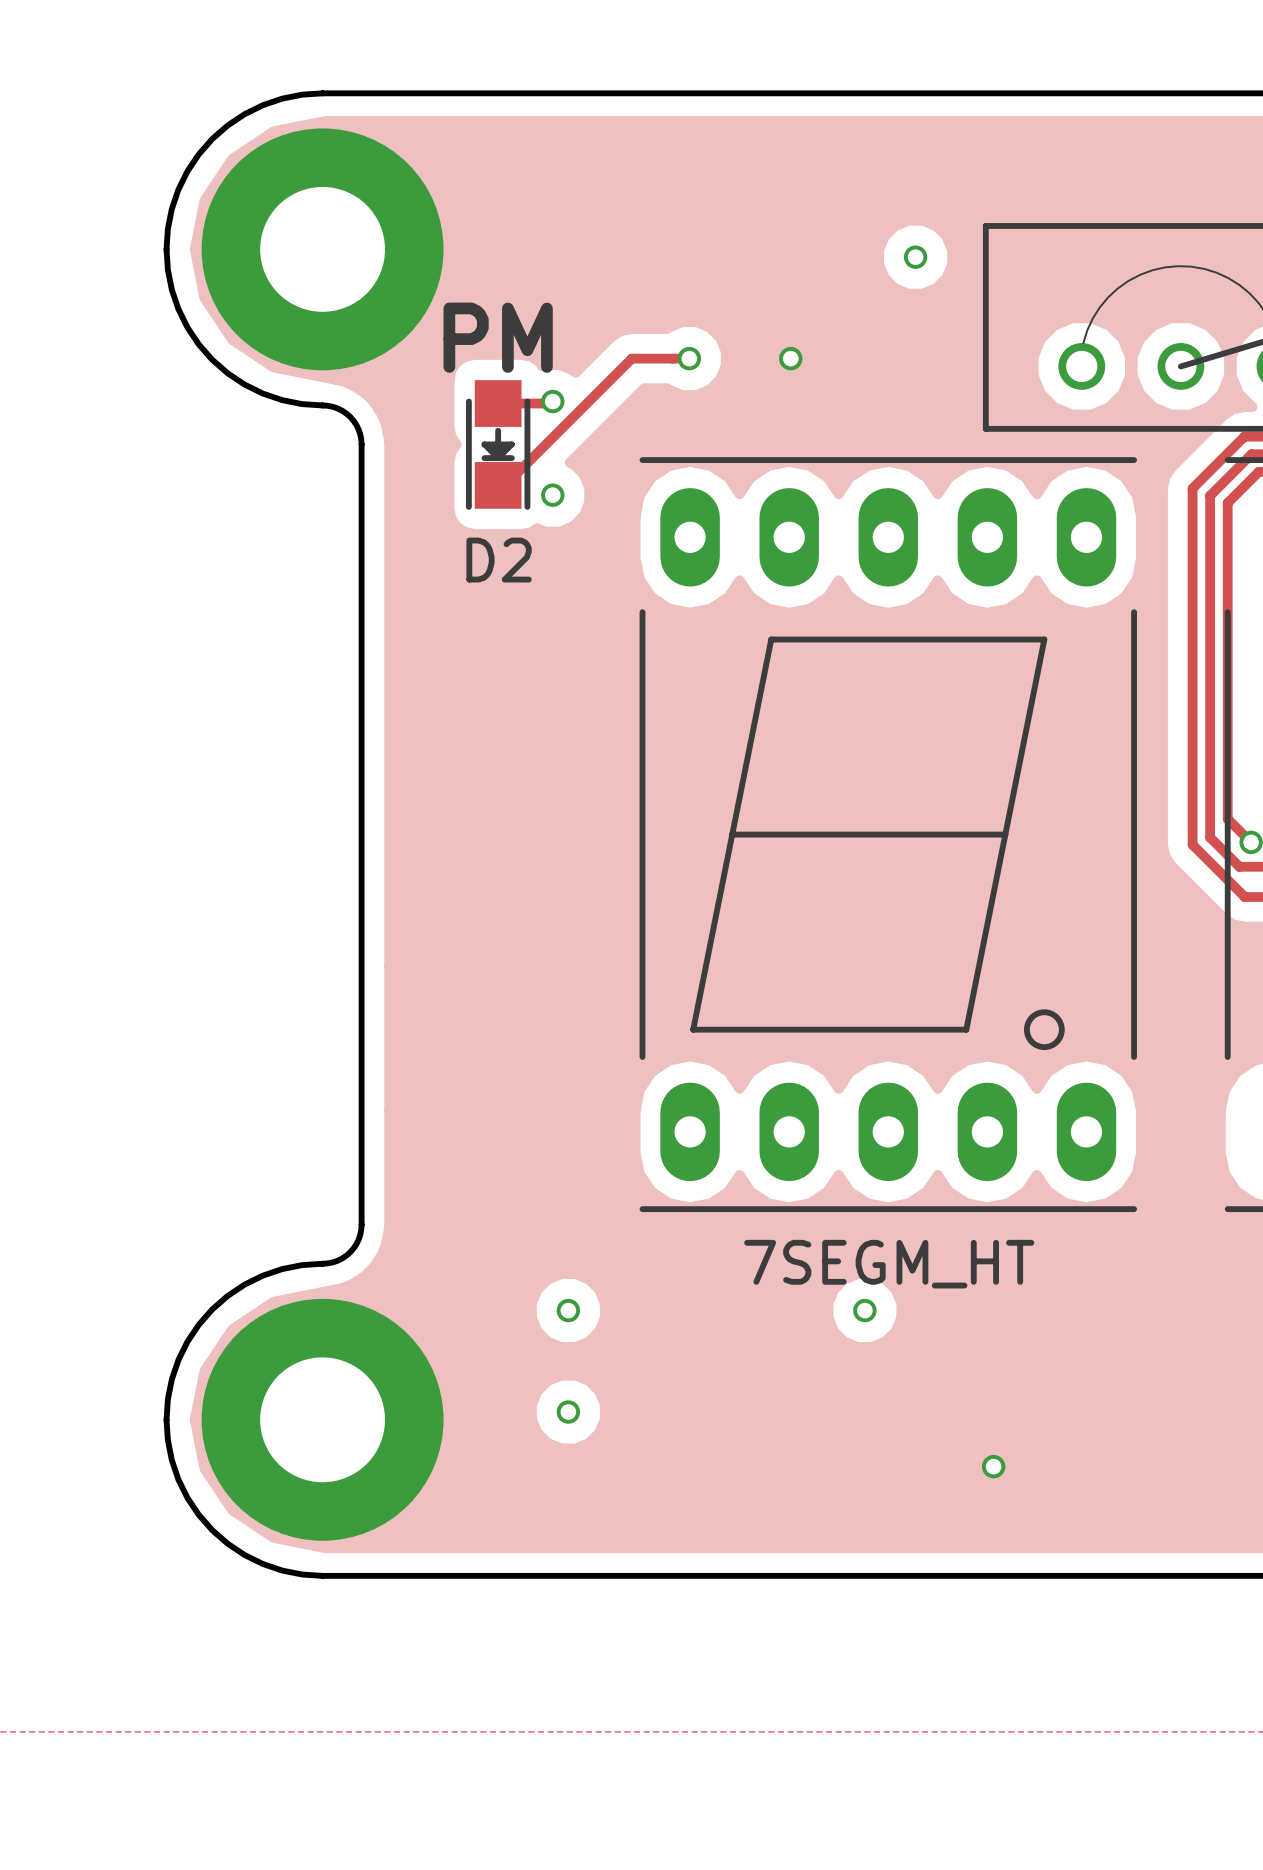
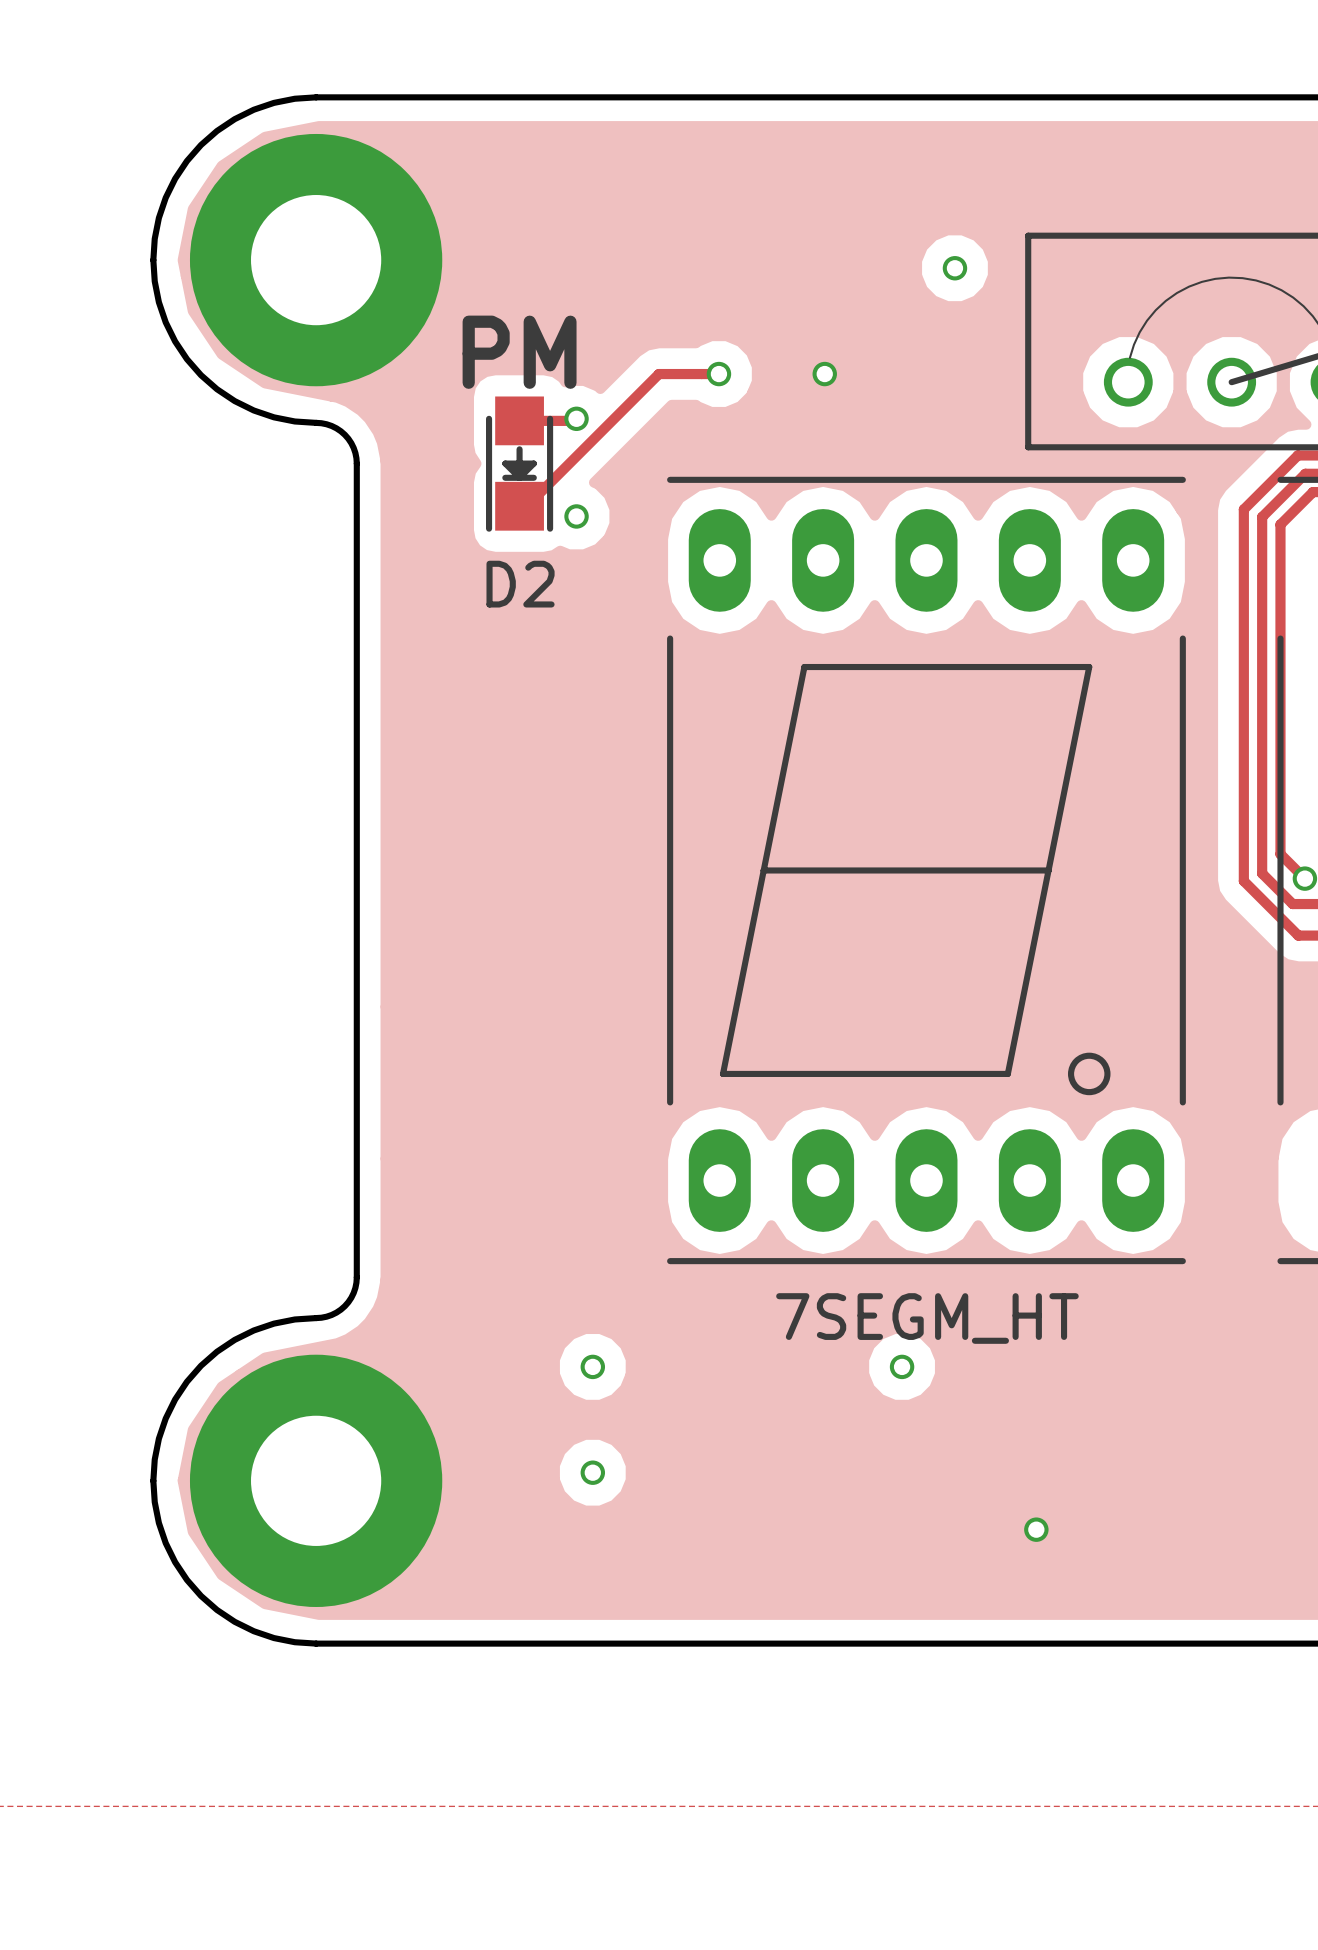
board edge: (322, 93) (282, 98) (262, 105) (227, 125) (212, 139) (198, 154) (178, 189) (171, 209) (166, 249) (171, 289) (178, 309) (198, 344) (212, 359) (227, 373) (262, 393) (282, 400) (327, 405) (342, 410) (353, 420) (361, 439) (361, 1229) (353, 1248) (342, 1258) (327, 1263) (282, 1269) (262, 1275) (227, 1296) (212, 1309) (198, 1324) (178, 1360) (171, 1379) (166, 1419) (171, 1460) (178, 1479) (198, 1514) (212, 1530) (227, 1543) (262, 1563) (282, 1570) (322, 1575) -> (336, 97) (294, 98) (253, 109) (217, 130) (201, 145) (186, 161) (165, 197) (158, 217) (153, 260) (158, 302) (165, 322) (186, 359) (201, 375) (217, 389) (253, 410) (273, 417) (294, 421) (321, 423) (336, 428) (348, 438) (356, 458) (356, 1282) (348, 1302) (336, 1312) (321, 1317) (294, 1319) (273, 1323) (253, 1330) (217, 1351) (201, 1365) (186, 1381) (165, 1418) (158, 1438) (153, 1480) (158, 1522) (165, 1543) (186, 1579) (201, 1595) (217, 1609) (253, 1631) (294, 1642) (336, 1643)
part position: (322, 249) -> (316, 260)
part position: (322, 1419) -> (316, 1480)

